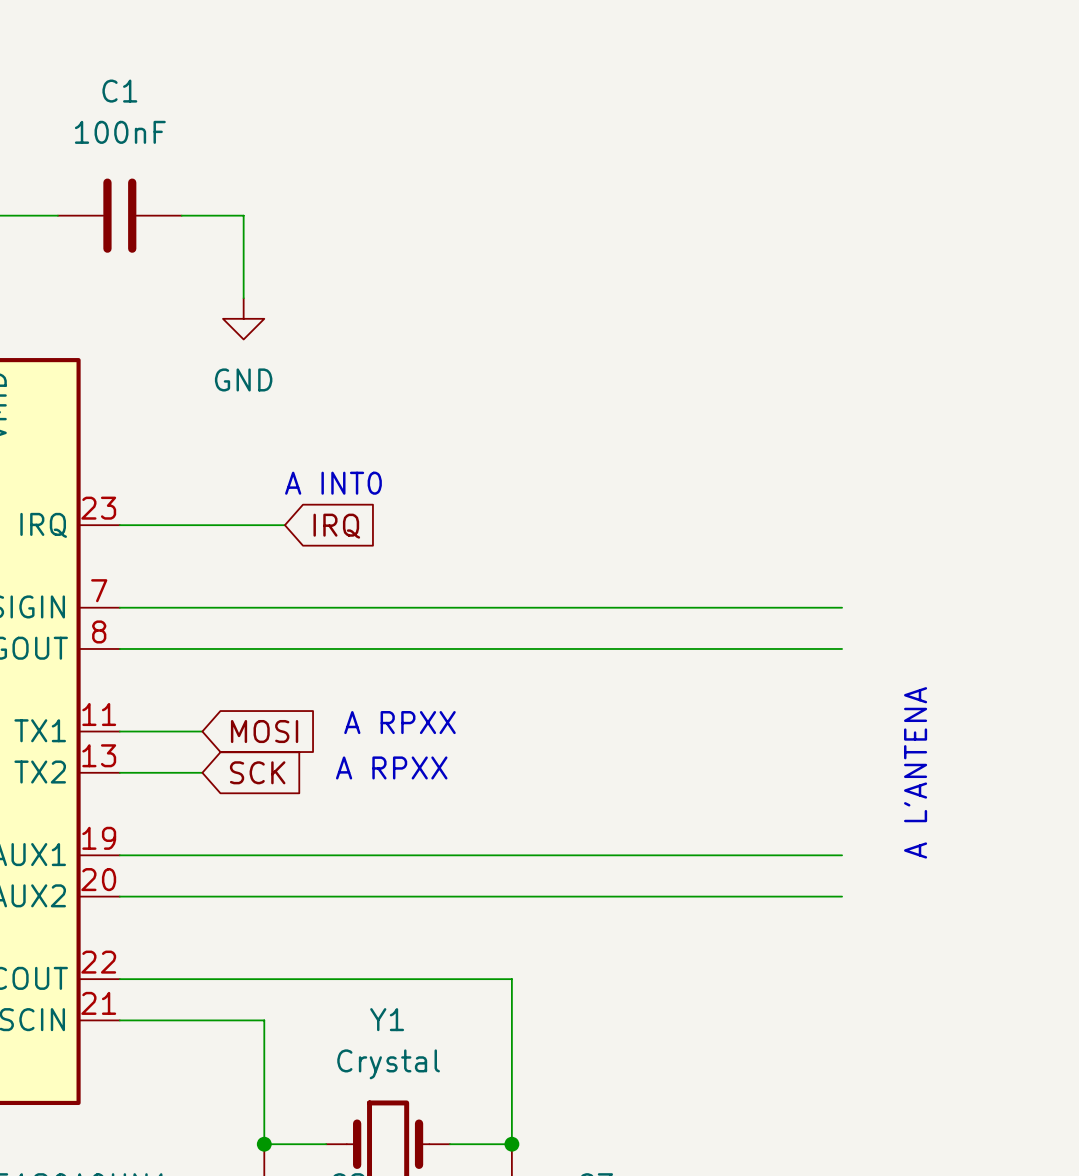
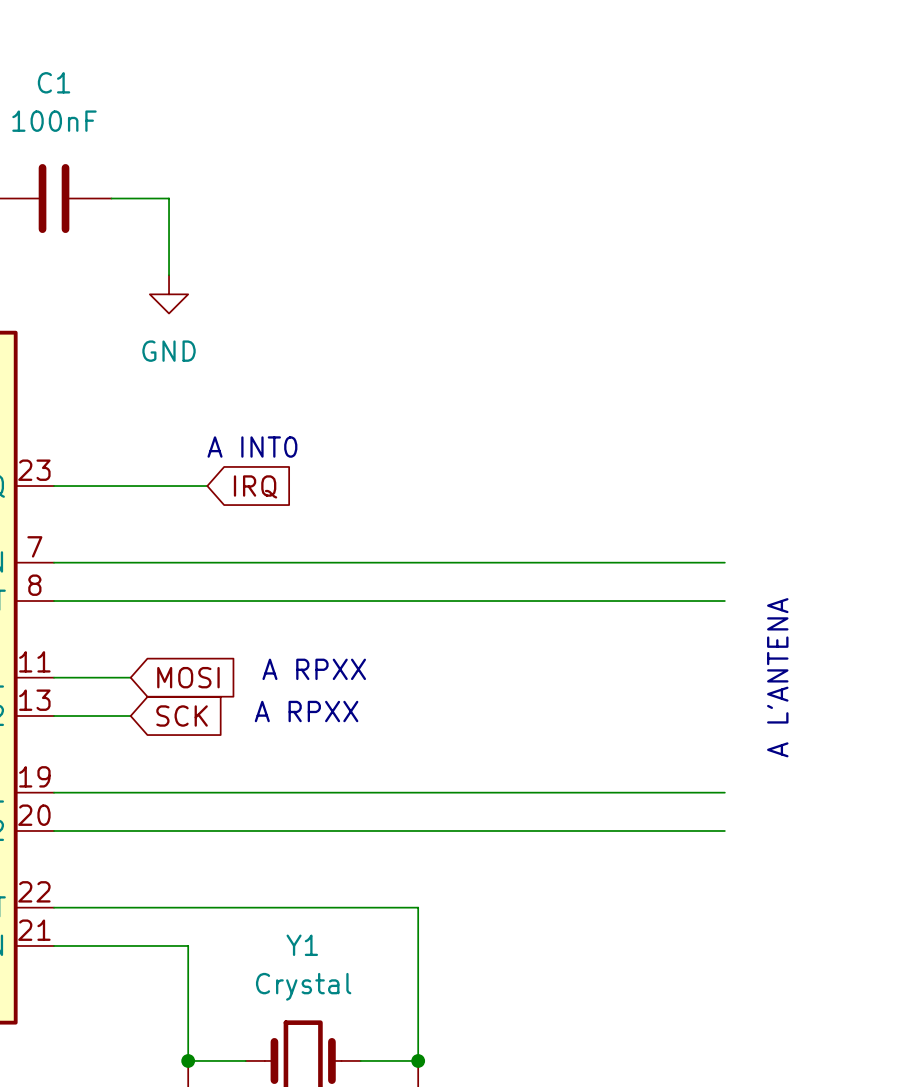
text position: A L'ANTENA (915, 772) -> A L'ANTENA (777, 677)

